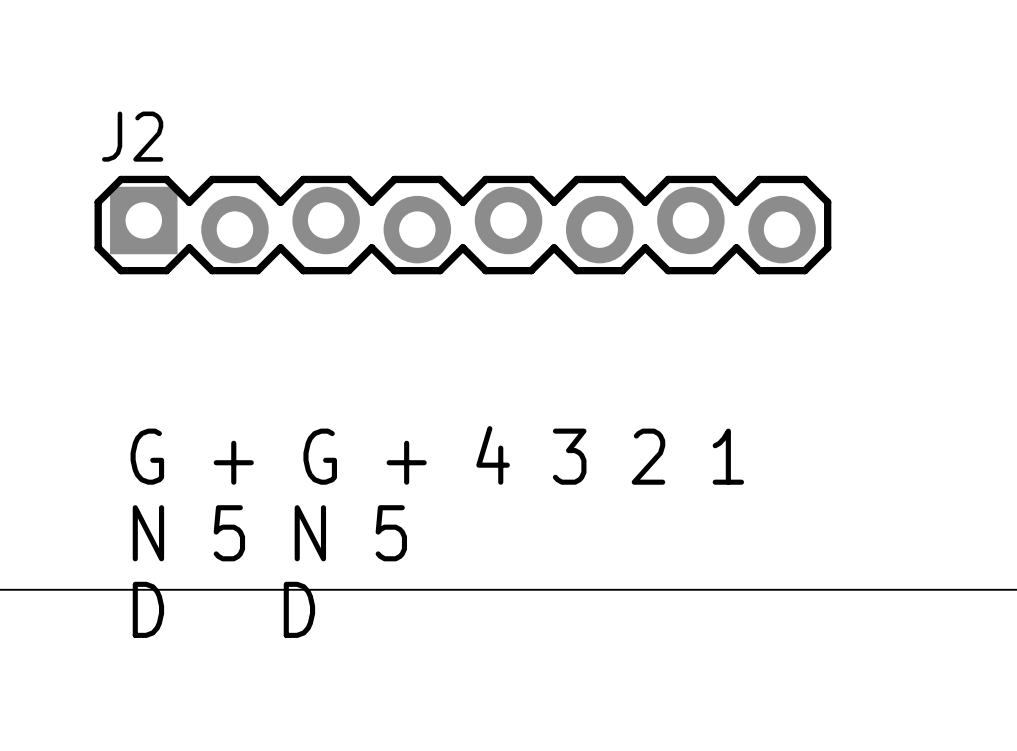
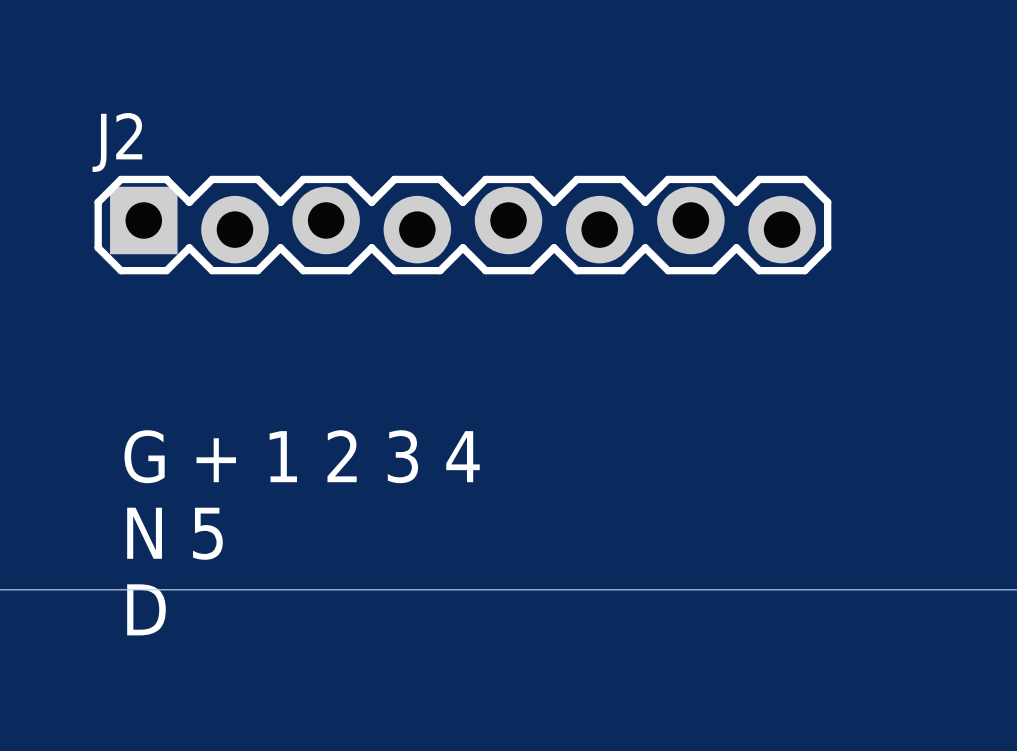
text: G + G + 4 3 2 1 (437, 455) -> G + 1 2 3 4 (302, 456)
text: N 5 N 5 (269, 533) -> N 5 (174, 533)
text: D D (223, 609) -> D (146, 609)

